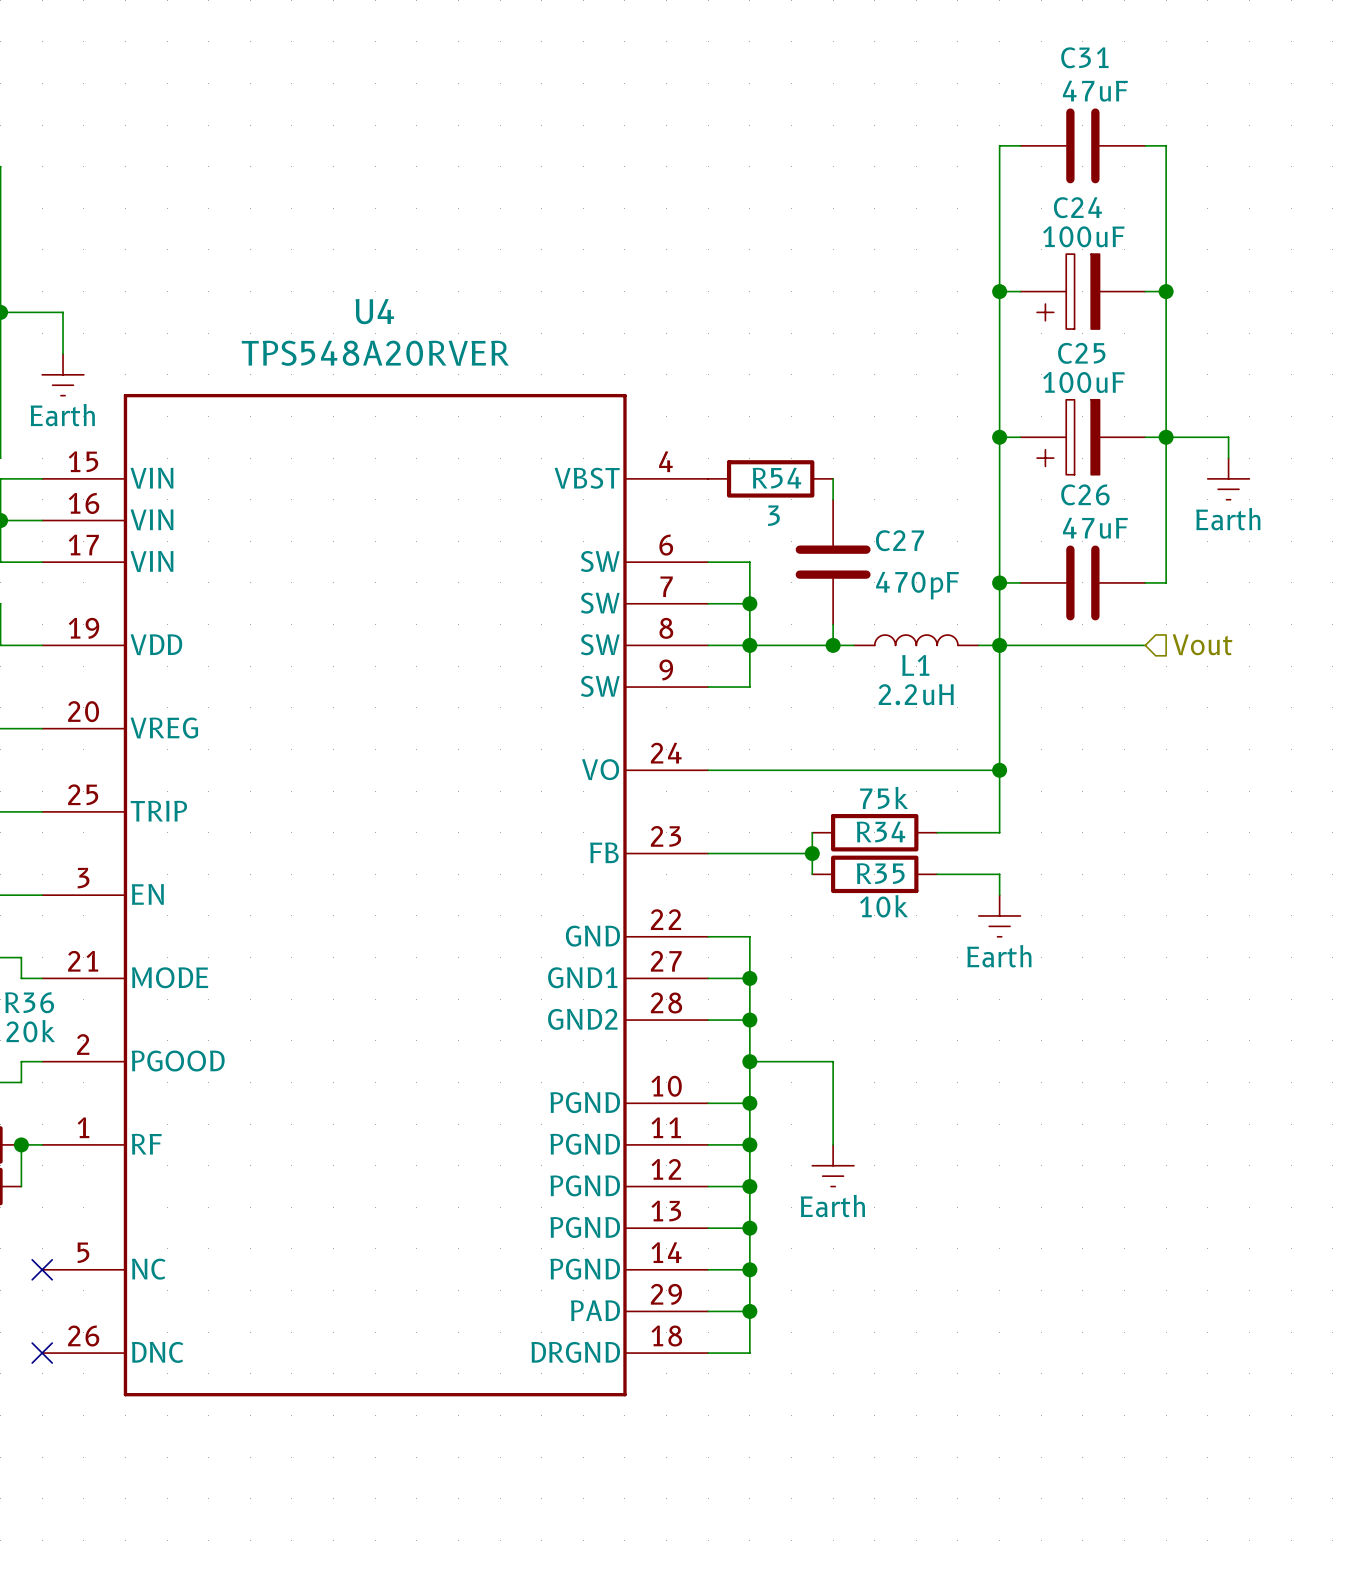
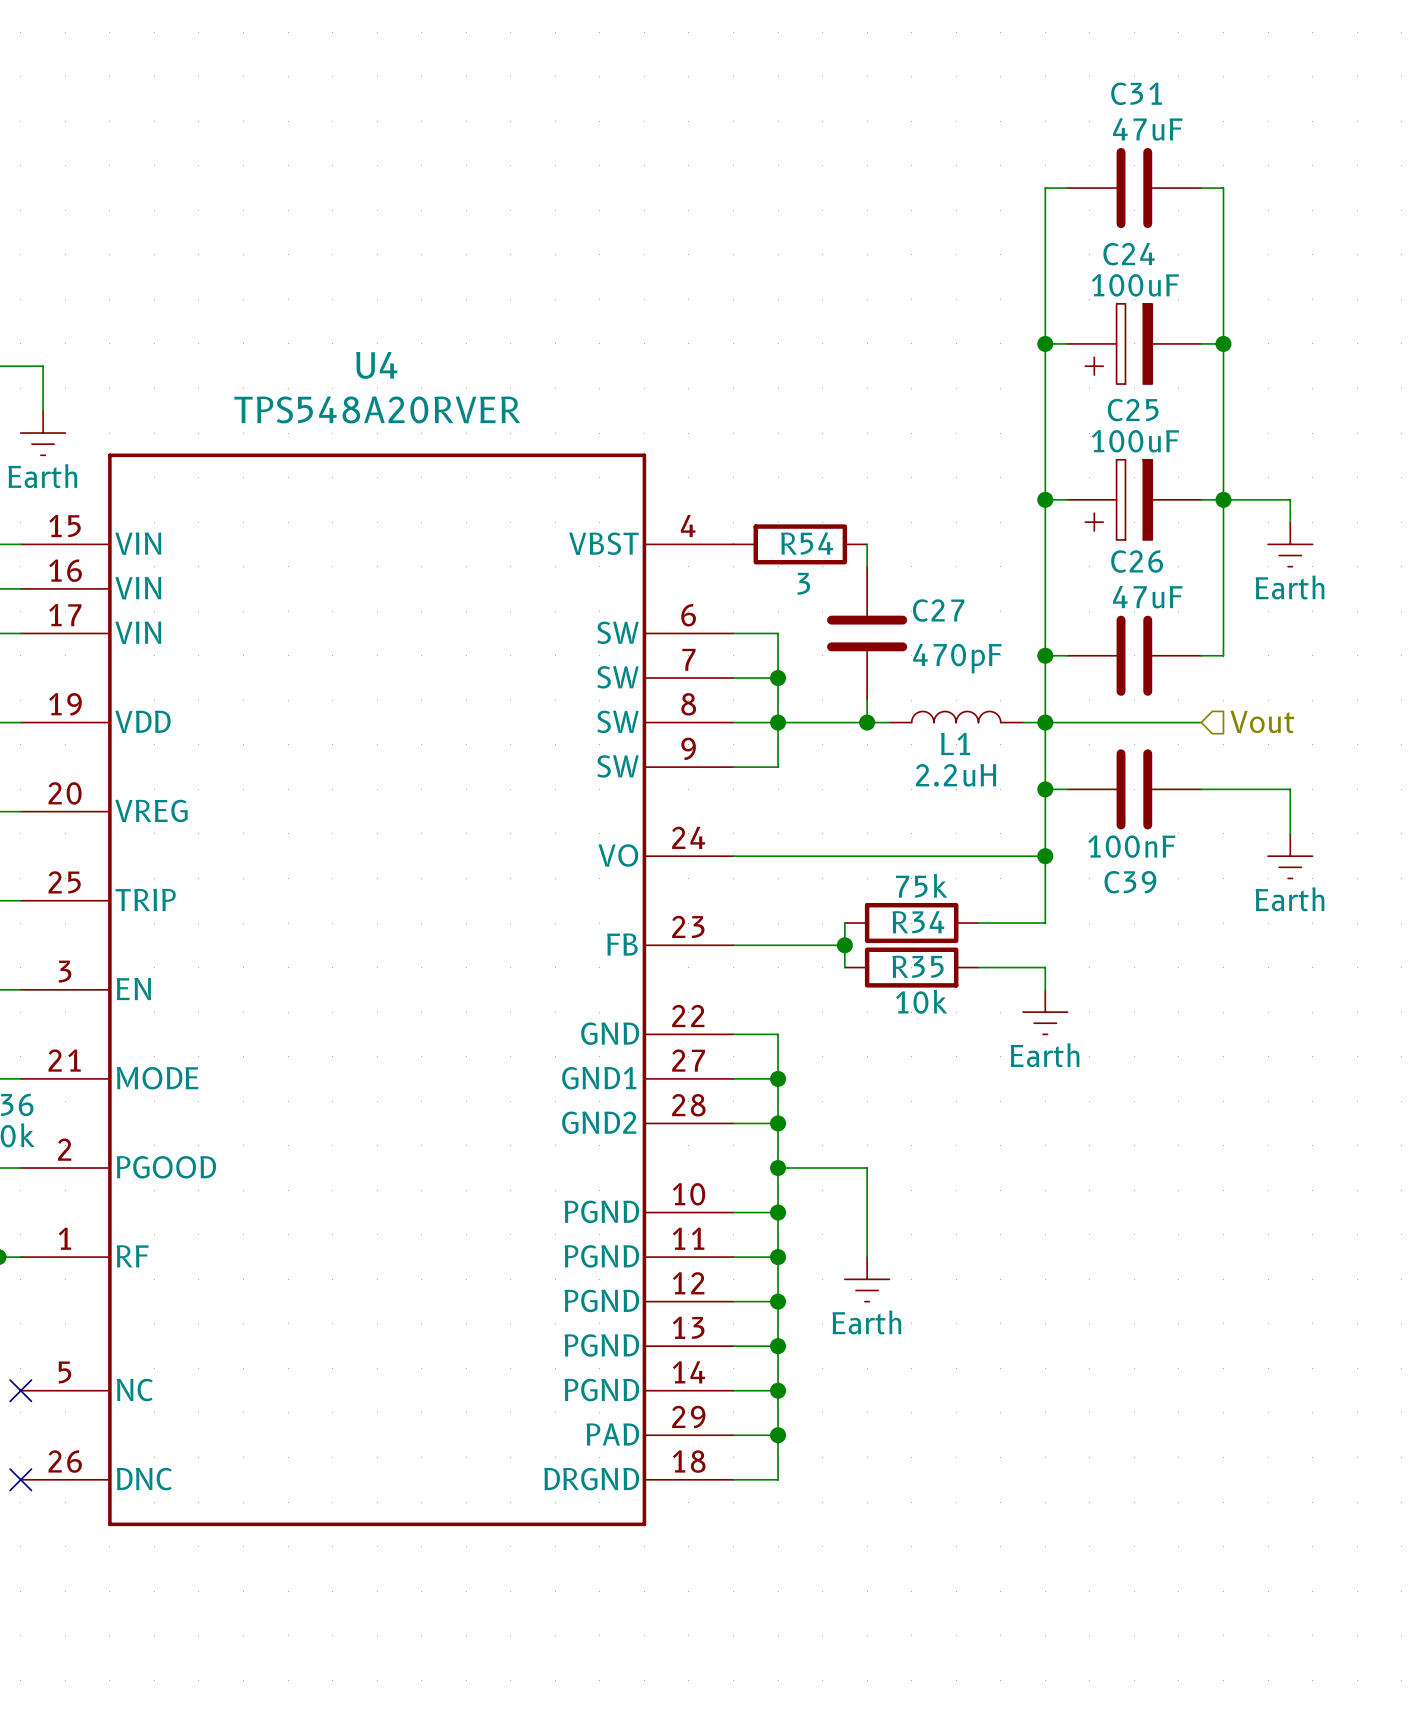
wire: none -> (1045, 789) (1067, 789)
junction: none -> (1045, 789)
C39: none -> 100nF (1134, 789)
wire: none -> (1201, 789) (1290, 789) (1290, 833)
power symbol: none -> Earth (1290, 856)

